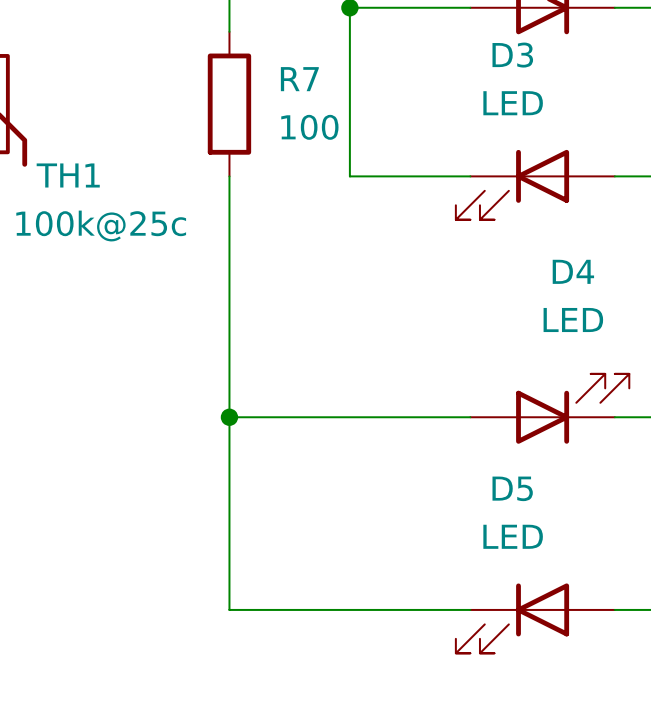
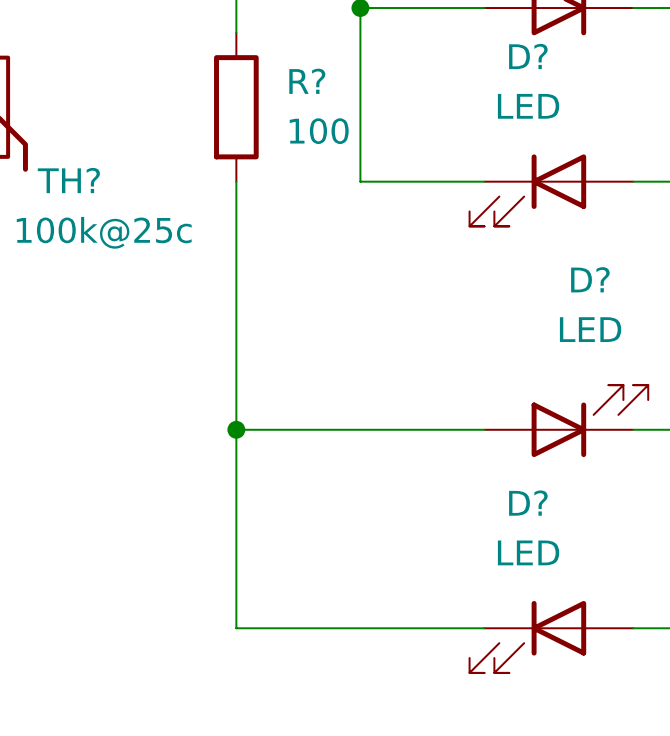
D3 name: D3 (512, 55) -> D? (528, 56)
R7 name: R7 (299, 79) -> R? (307, 81)
TH1 name: TH1 (68, 175) -> TH? (68, 180)
D4 name: D4 (573, 271) -> D? (590, 279)
D5 name: D5 (512, 488) -> D? (528, 503)

